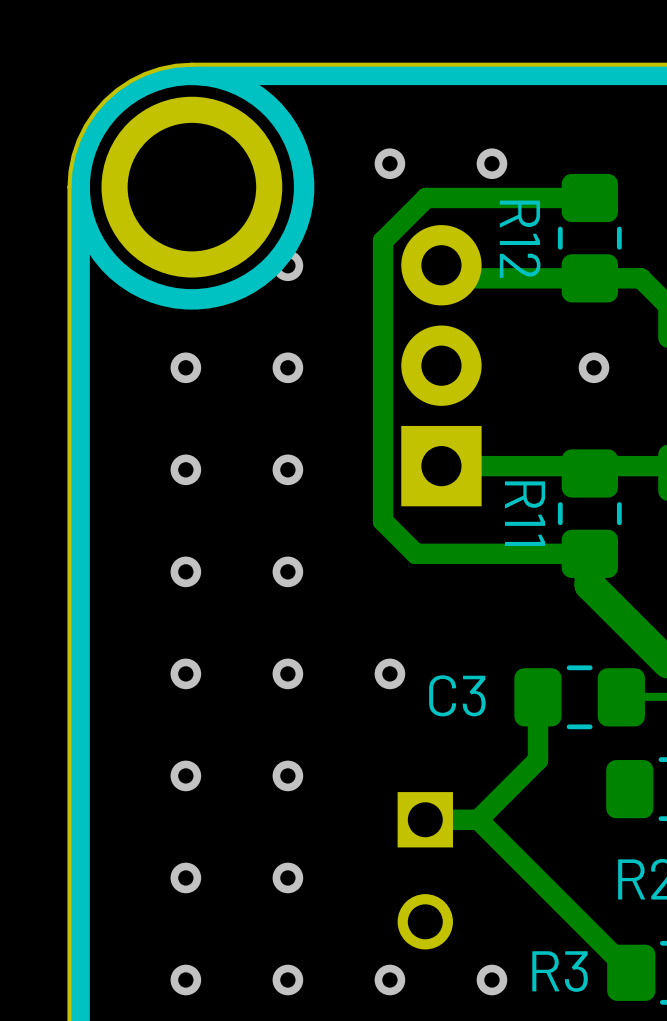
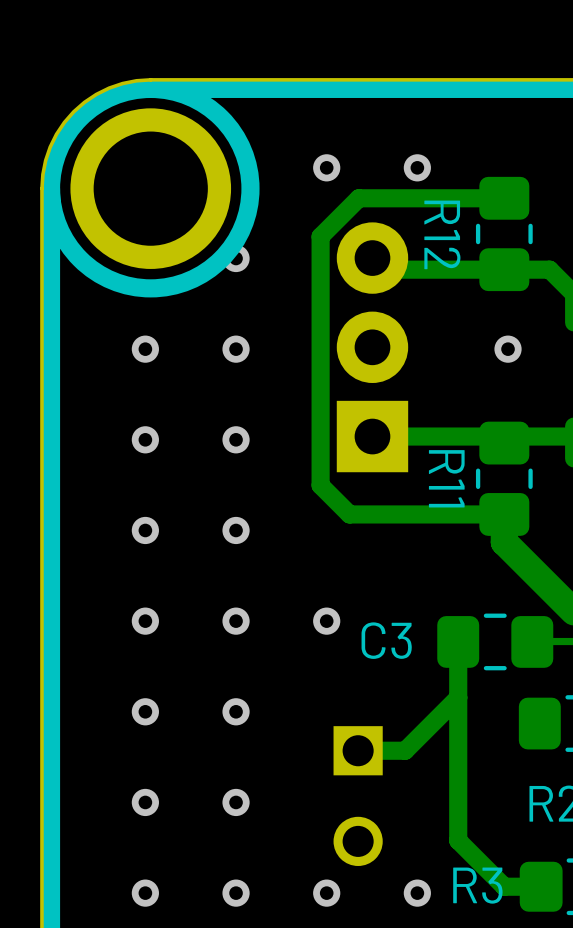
track: (478, 819) (631, 972) -> (458, 697) (458, 840) (504, 886) (541, 886)

